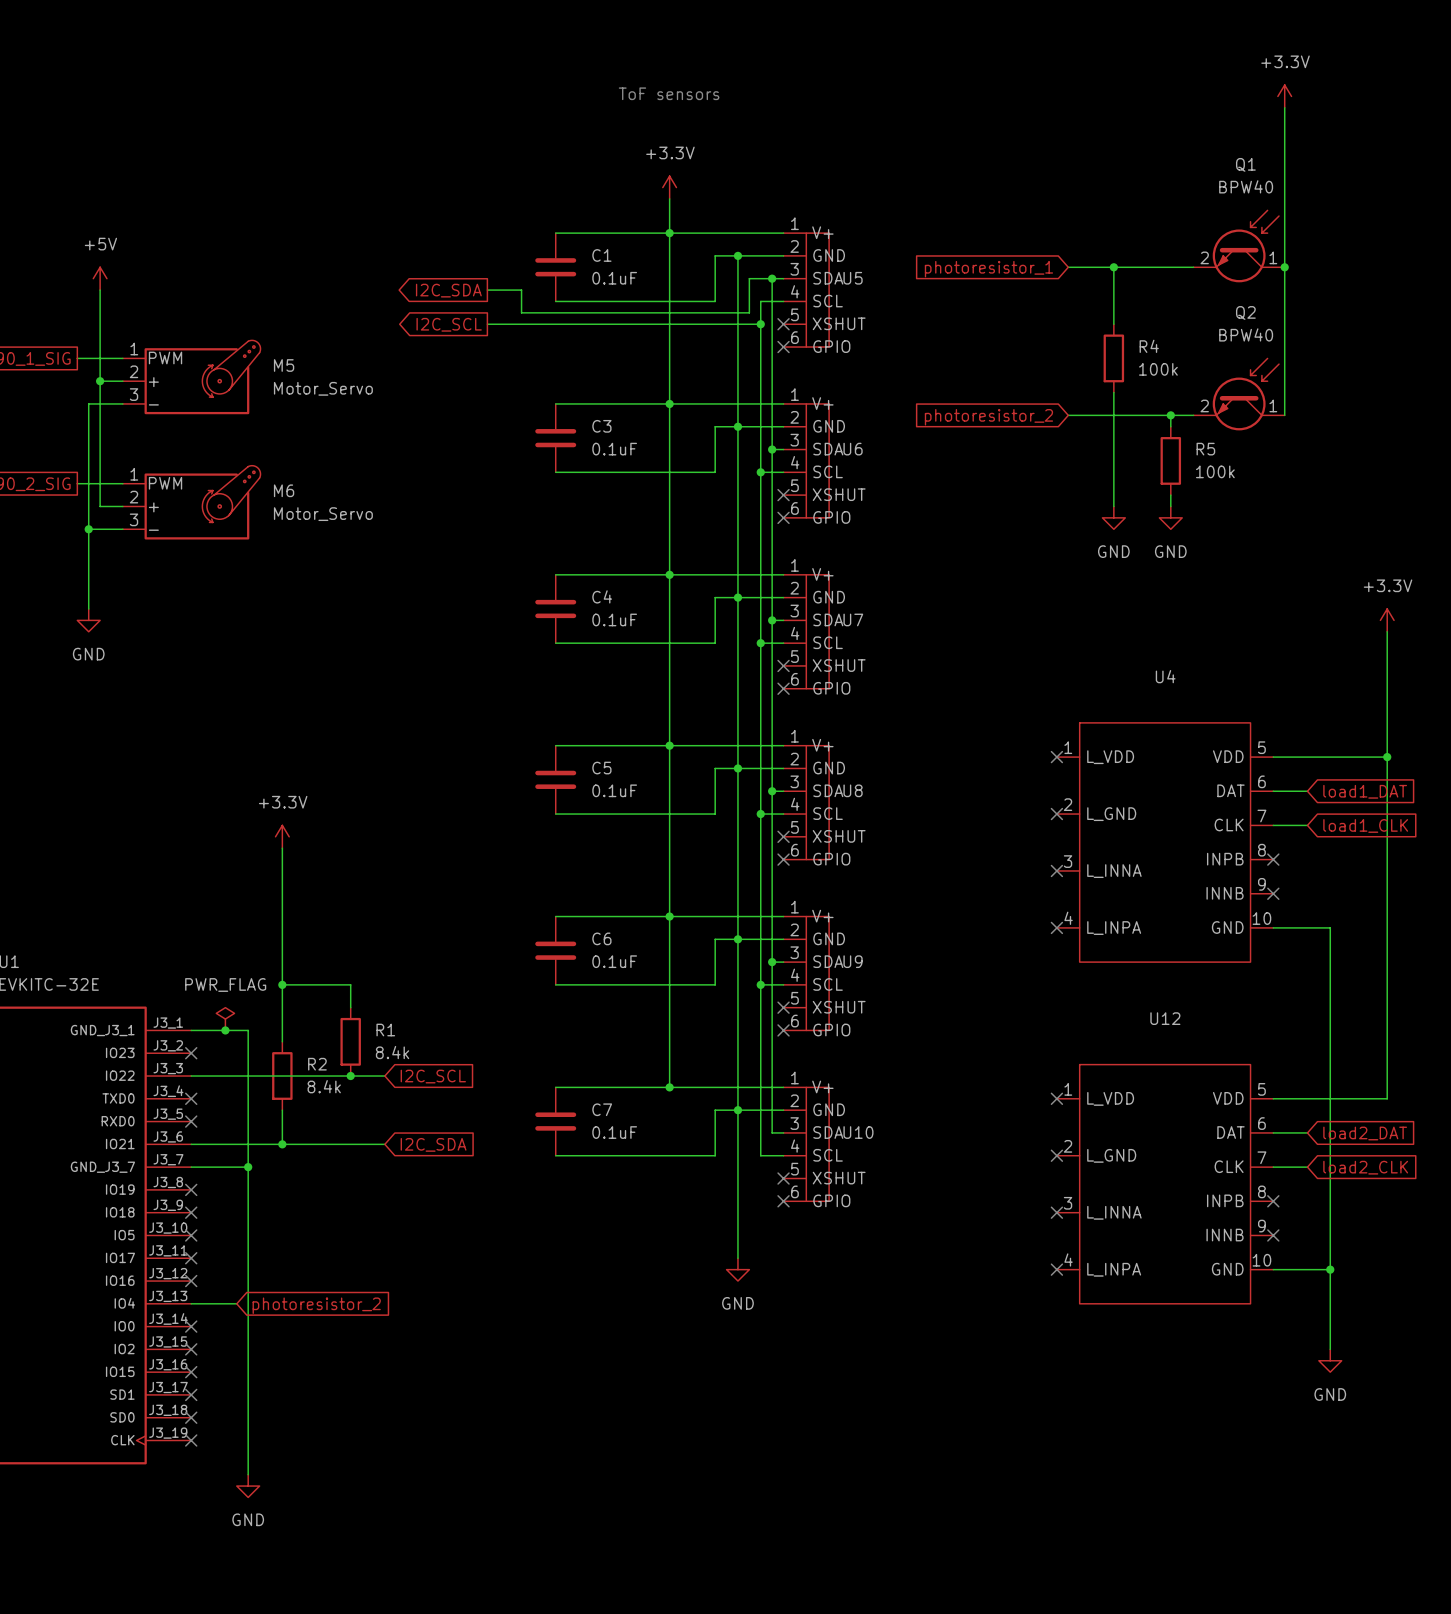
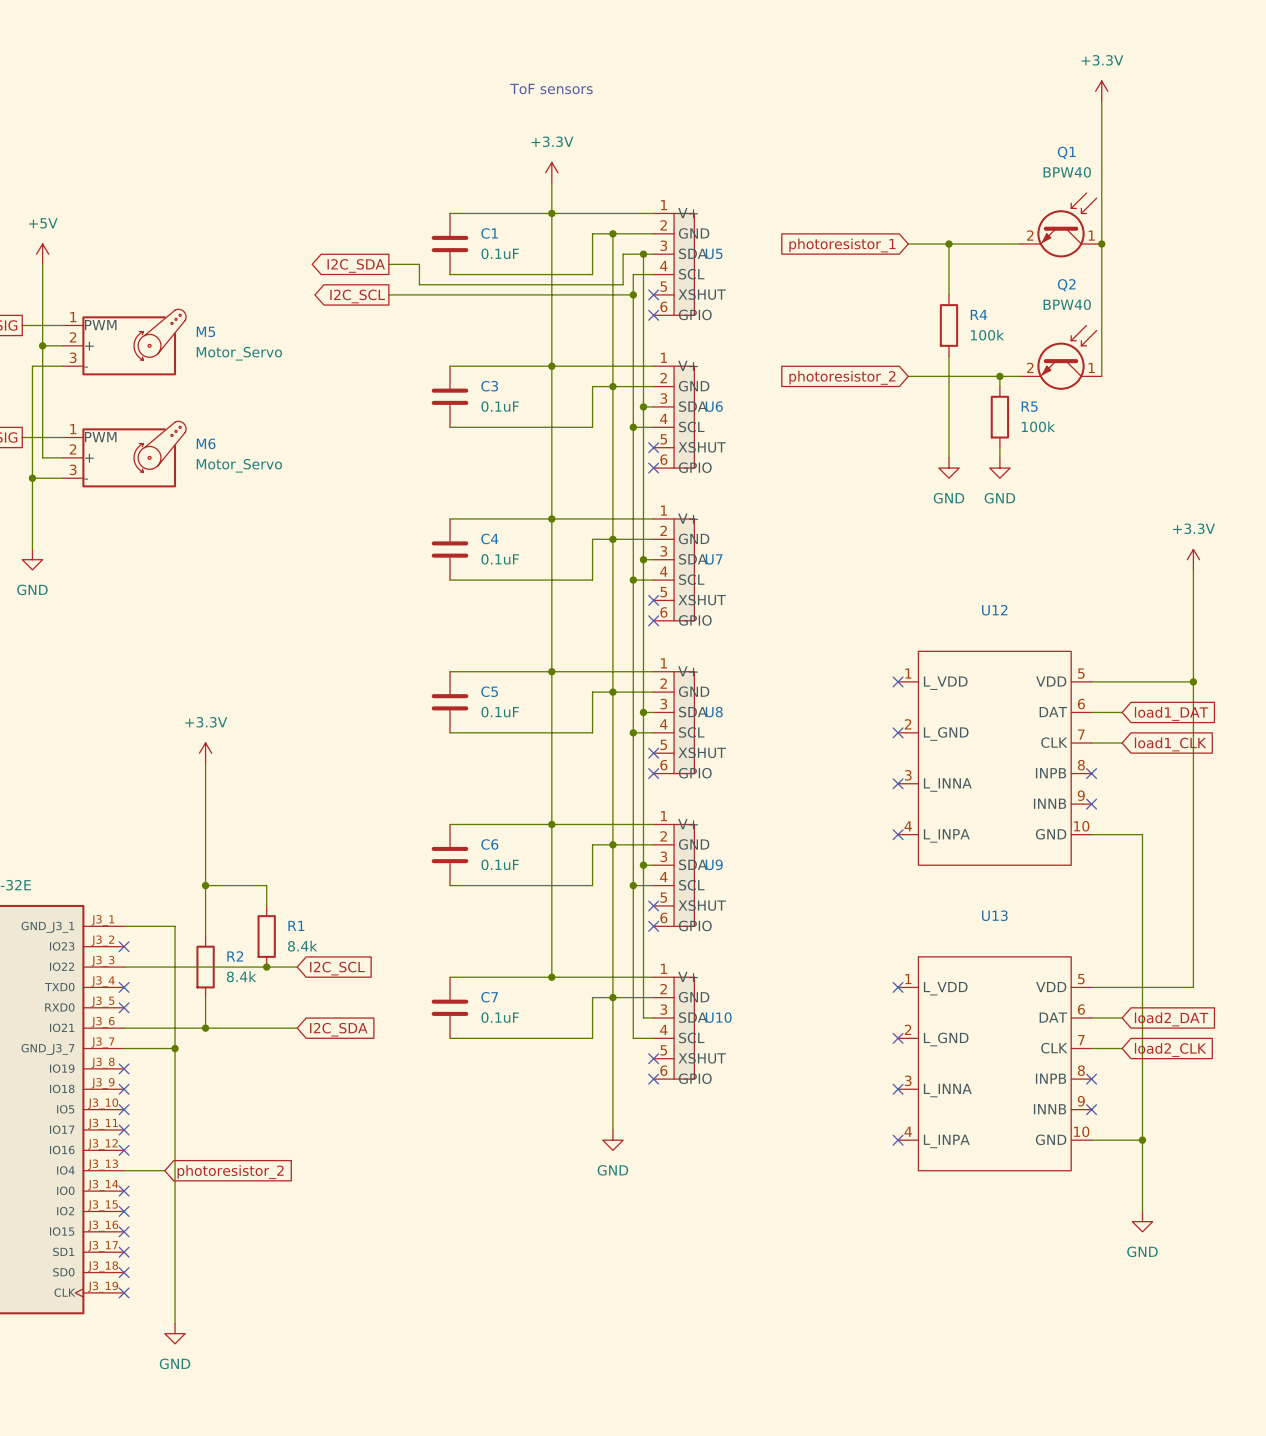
U4 name: U4 (1165, 676) -> U12 (994, 610)
U12 name: U12 (1165, 1018) -> U13 (994, 915)
power symbol: PWR_FLAG (225, 1019) -> none
junction: (225, 1030) -> none

